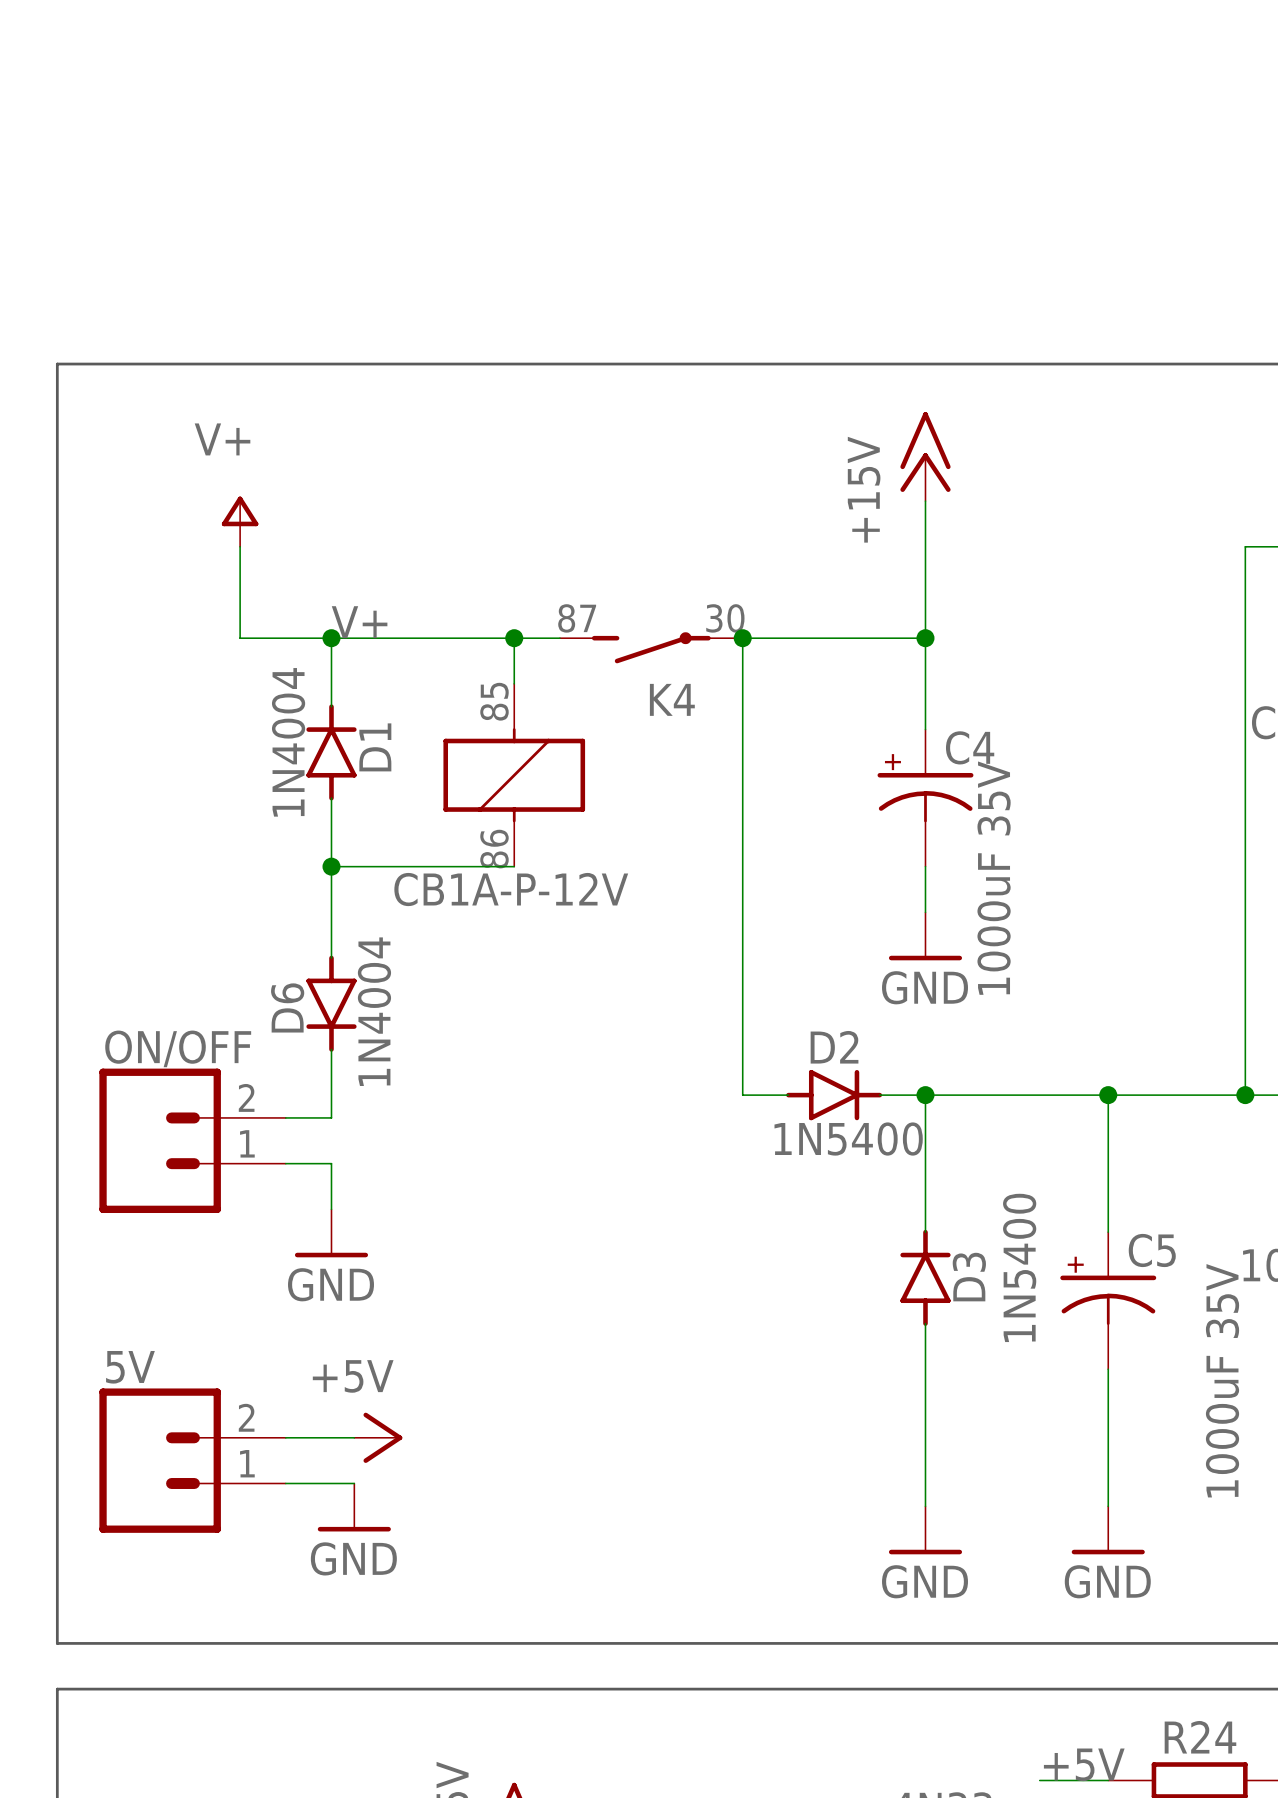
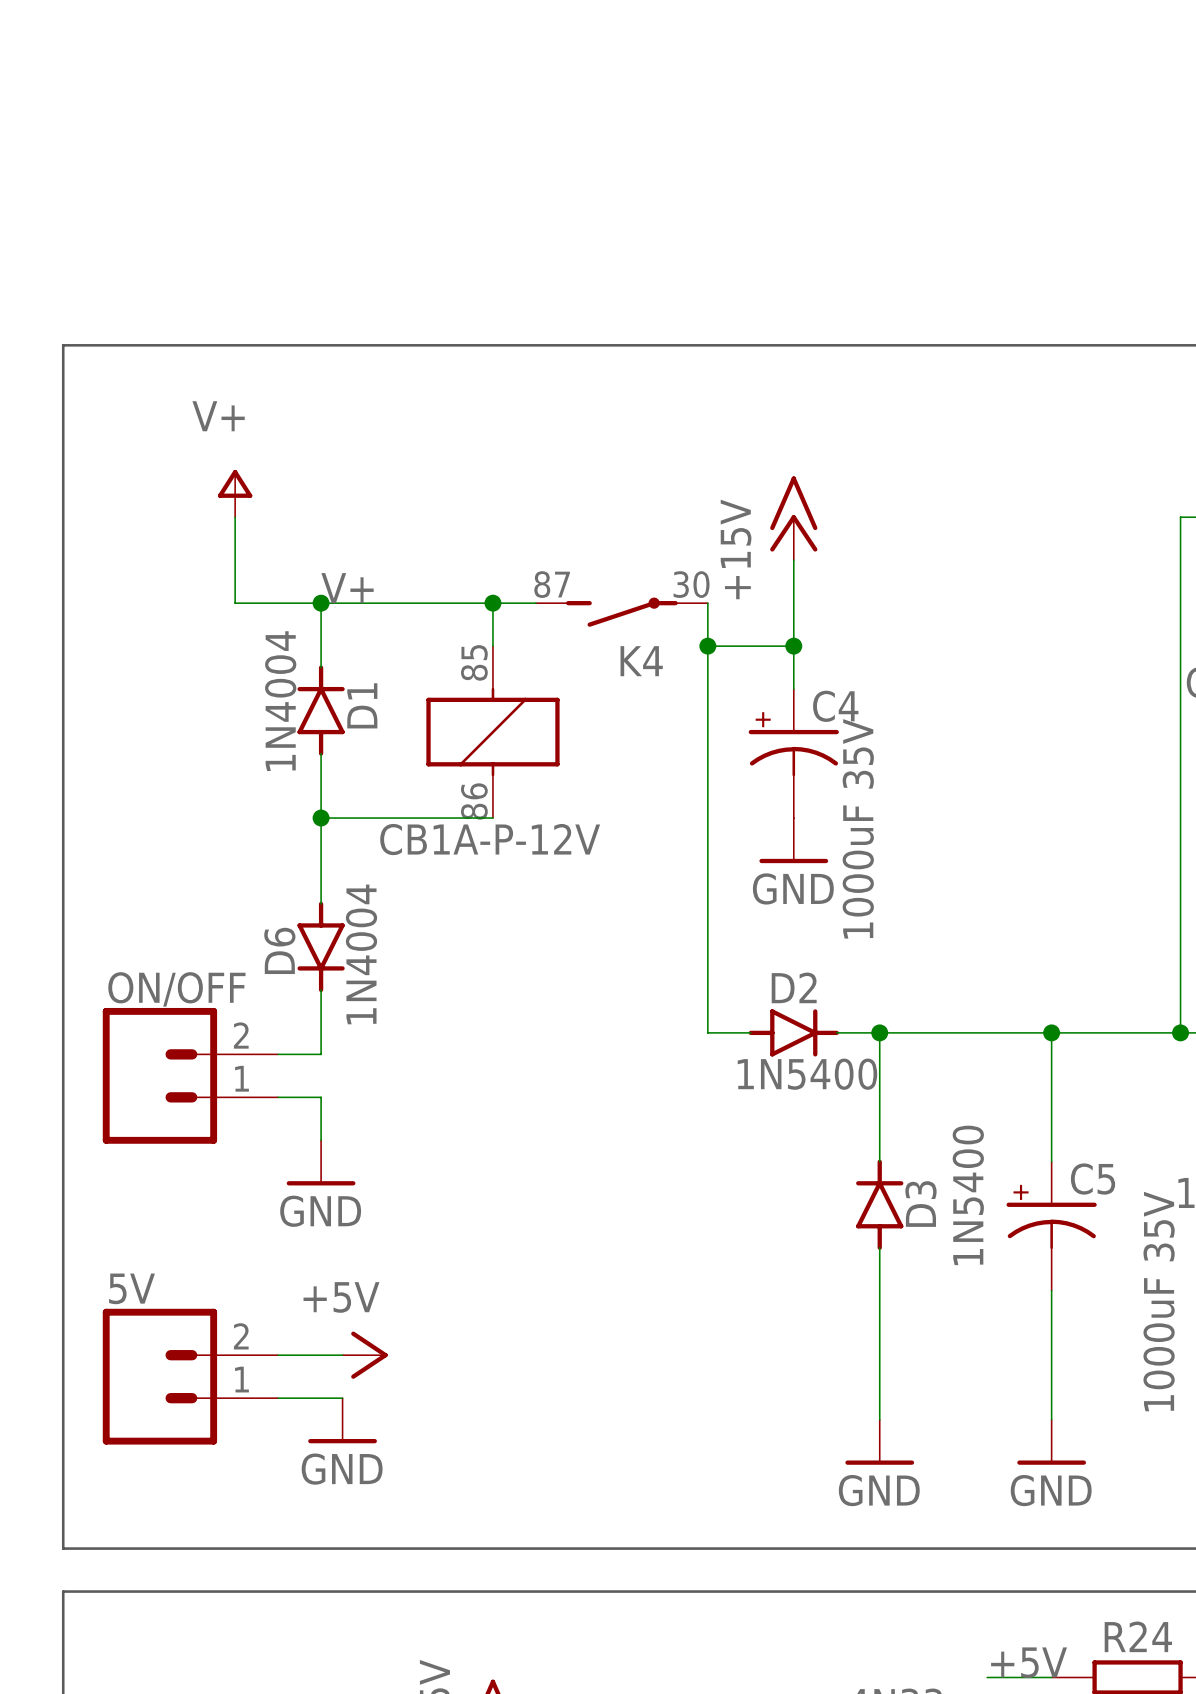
power symbol position: +15V (925, 456) -> +15V (793, 518)
wire: (925, 501) (925, 729) -> none
wire: none -> (793, 560) (793, 689)
wire: (742, 638) (925, 638) -> none
junction position: (742, 638) -> (707, 646)
junction: (925, 638) -> none
wire: none -> (707, 646) (793, 646)
junction: none -> (793, 646)
C4 position: (925, 798) -> (793, 753)
wire: (925, 866) (925, 912) -> none
power symbol position: GND (925, 936) -> GND (793, 840)

